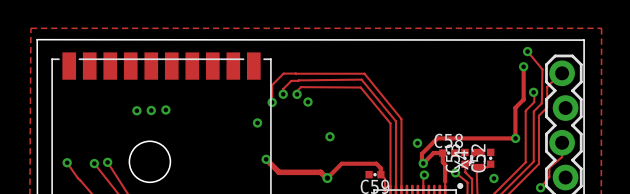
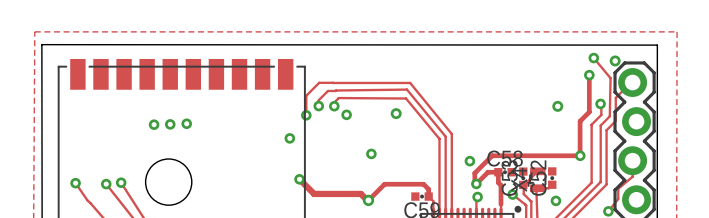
via: none -> (615, 60)
via: none -> (557, 106)
via: none -> (396, 113)

